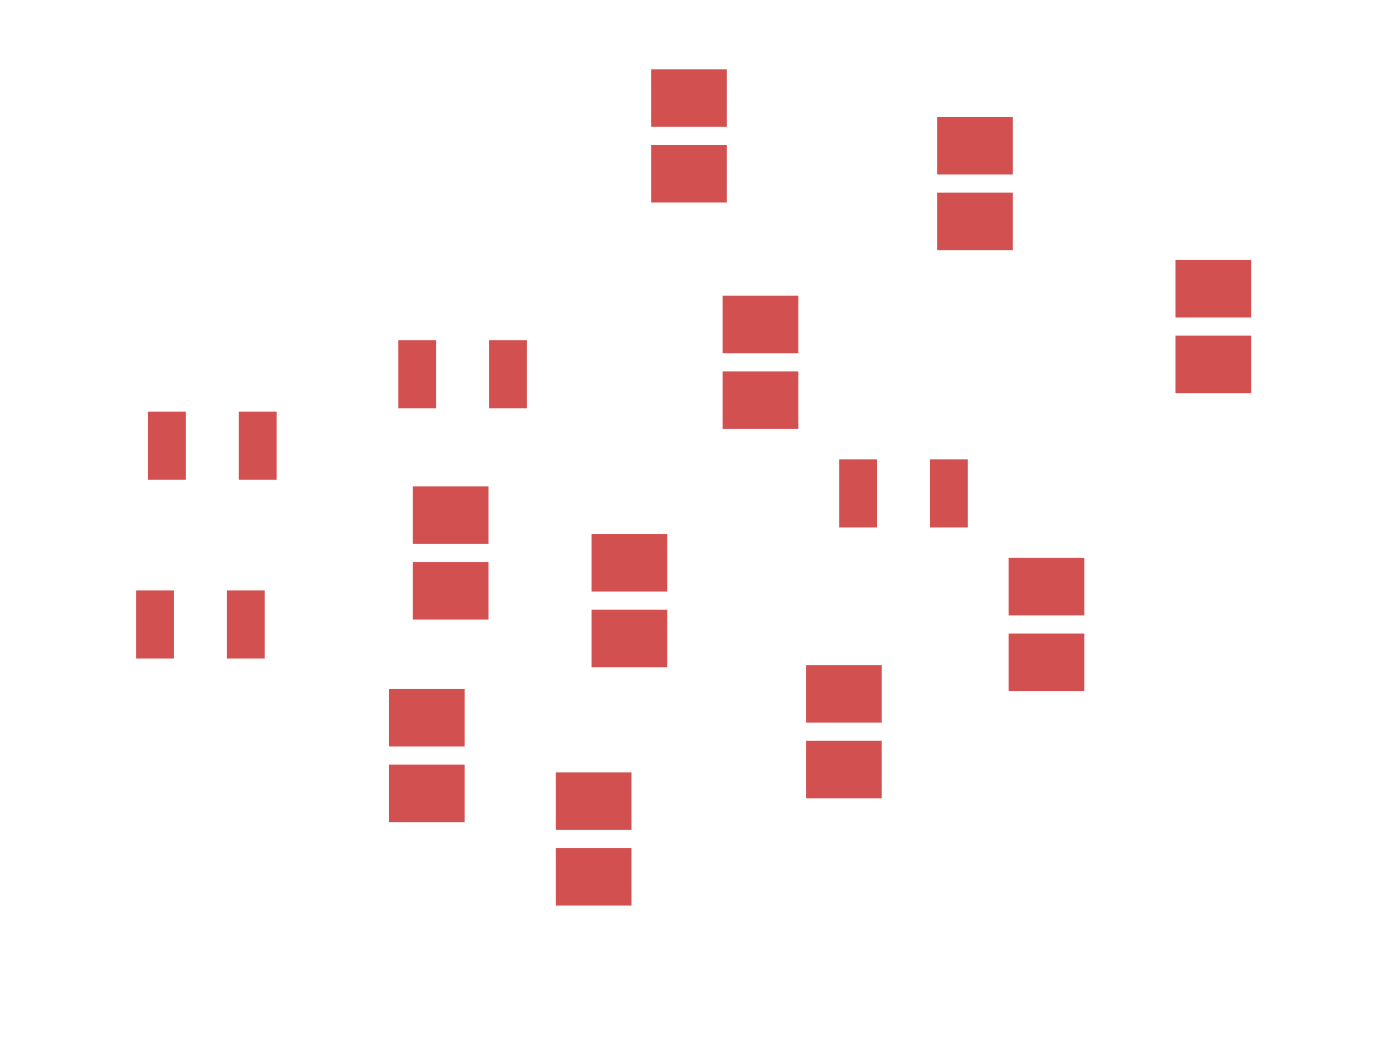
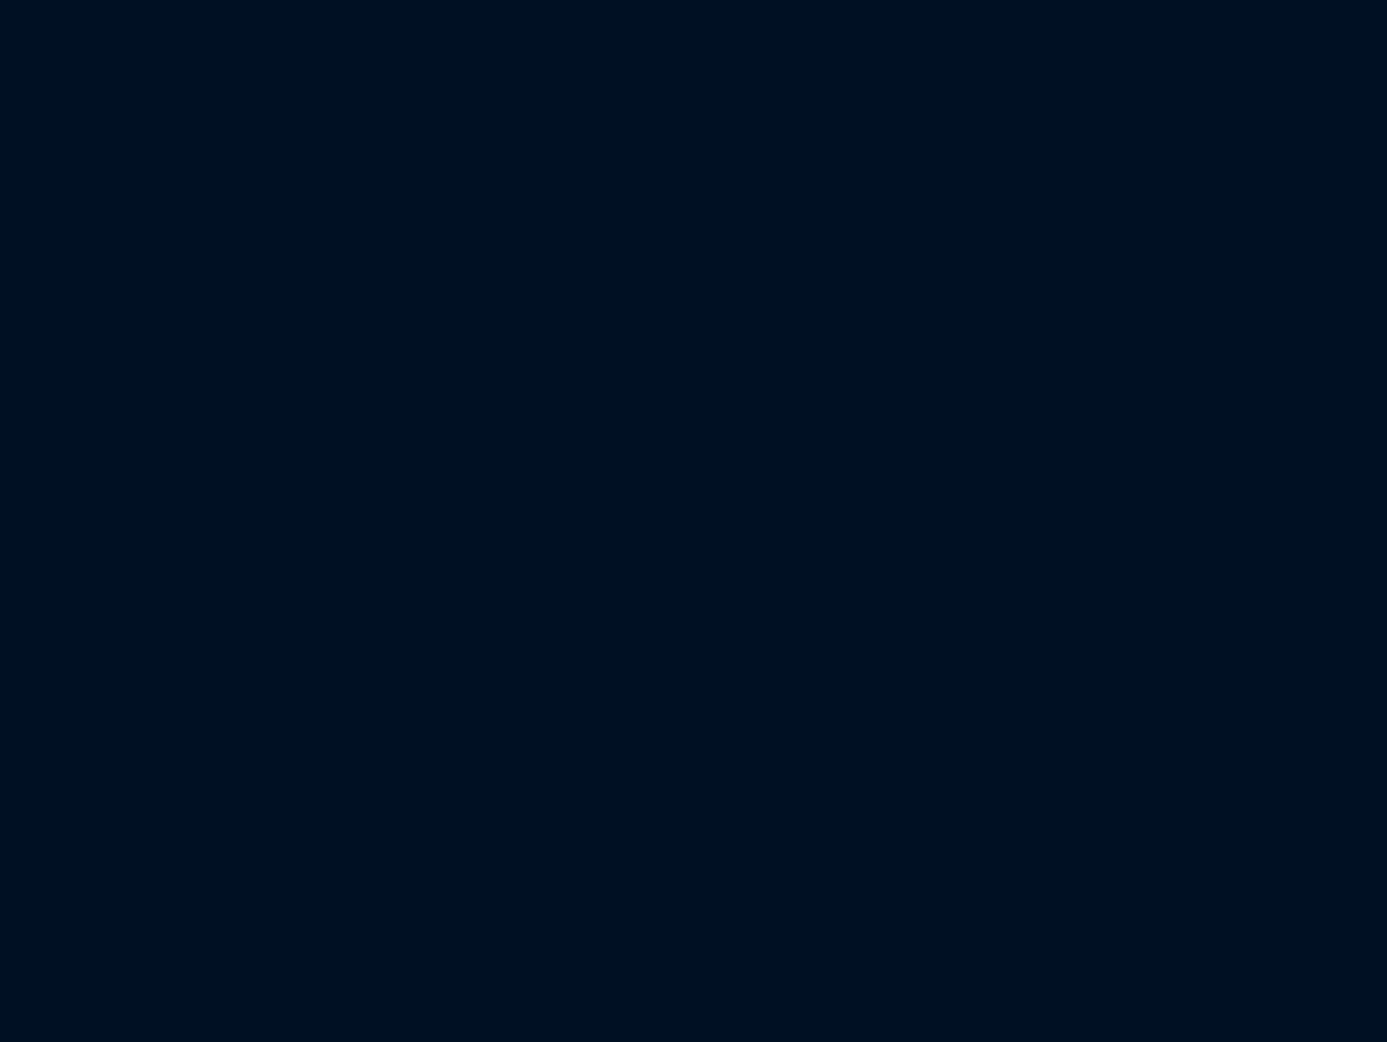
part: (688, 135) -> none
part: (974, 183) -> none
part: (1213, 326) -> none
part: (760, 362) -> none
part: (462, 374) -> none
part: (212, 445) -> none
part: (903, 493) -> none
part: (450, 552) -> none
part: (629, 600) -> none
part: (200, 624) -> none
part: (1046, 624) -> none
part: (843, 731) -> none
part: (426, 755) -> none
part: (593, 838) -> none

